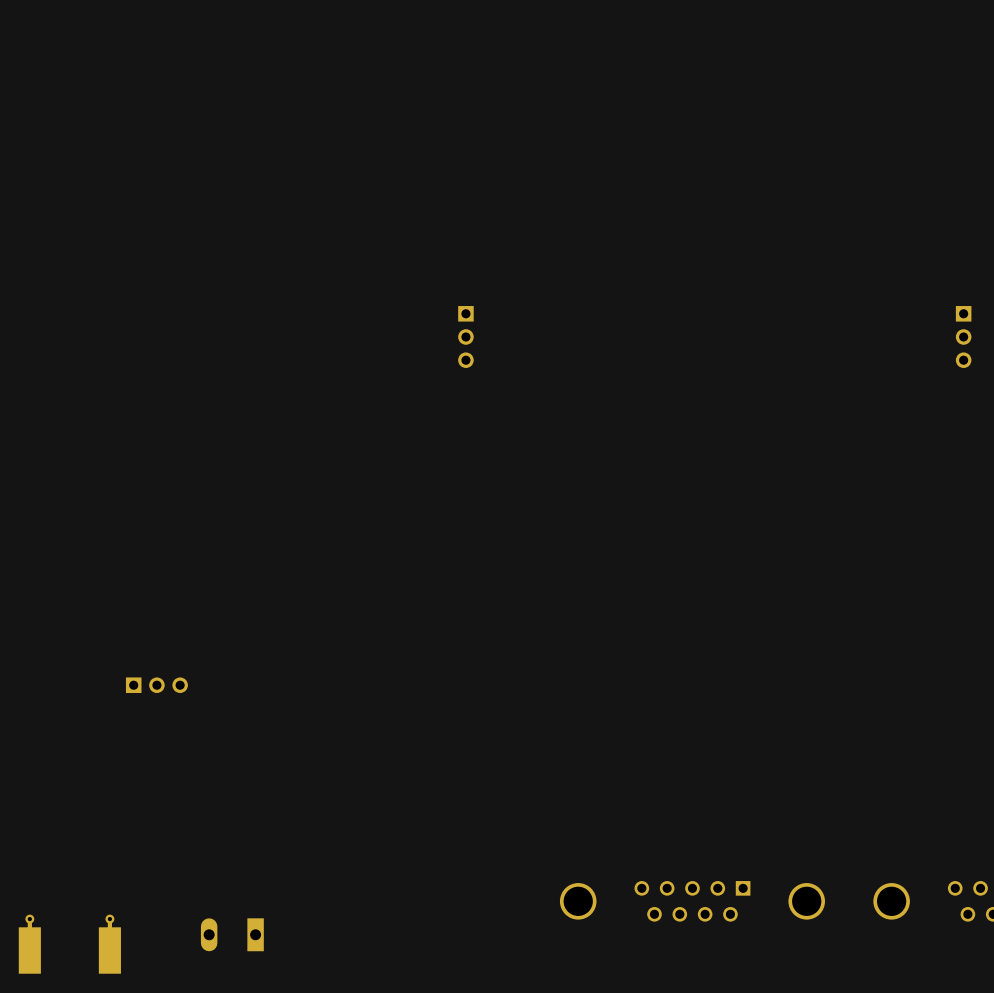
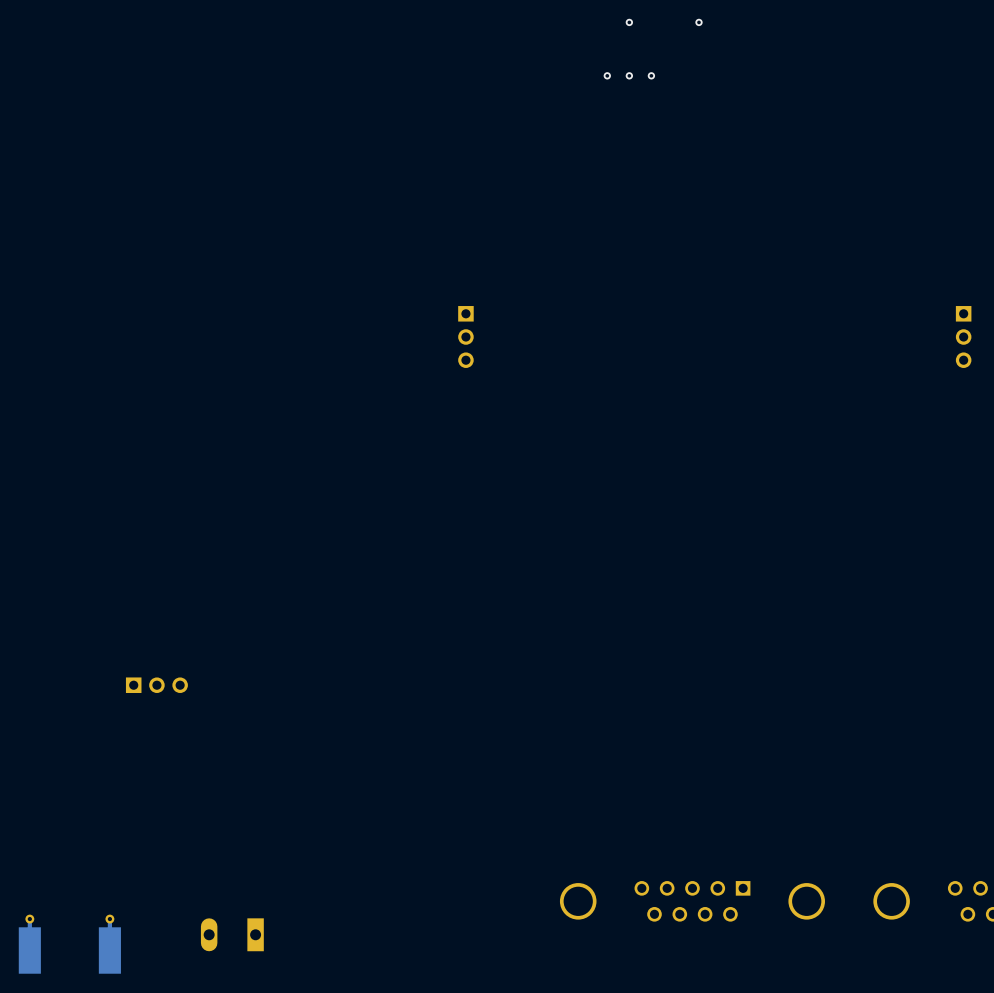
via: none -> (629, 22)
via: none -> (699, 22)
via: none -> (607, 75)
via: none -> (629, 75)
via: none -> (651, 75)

